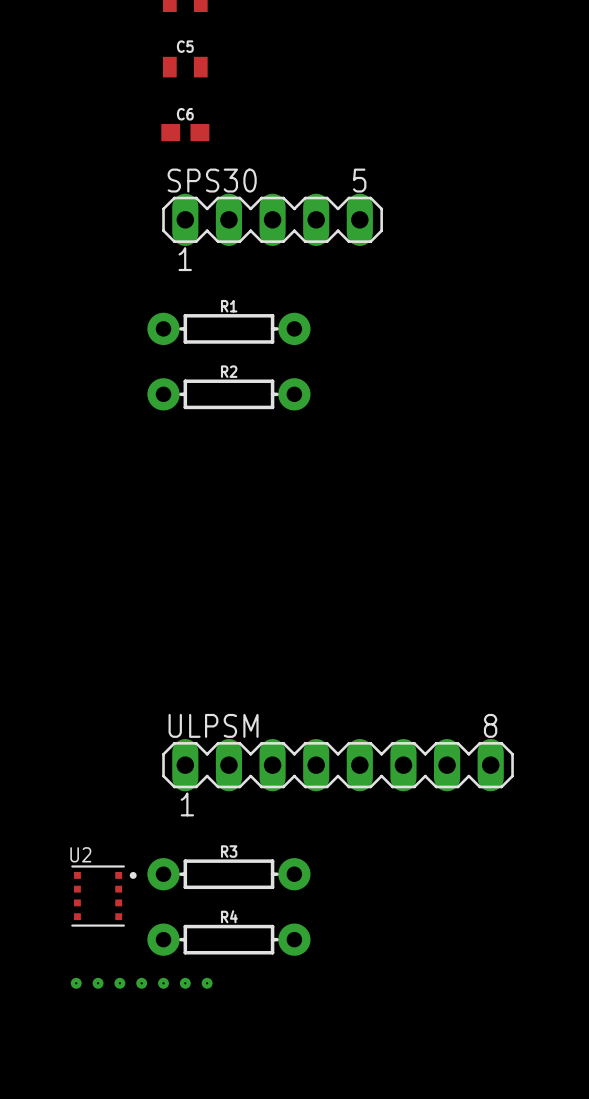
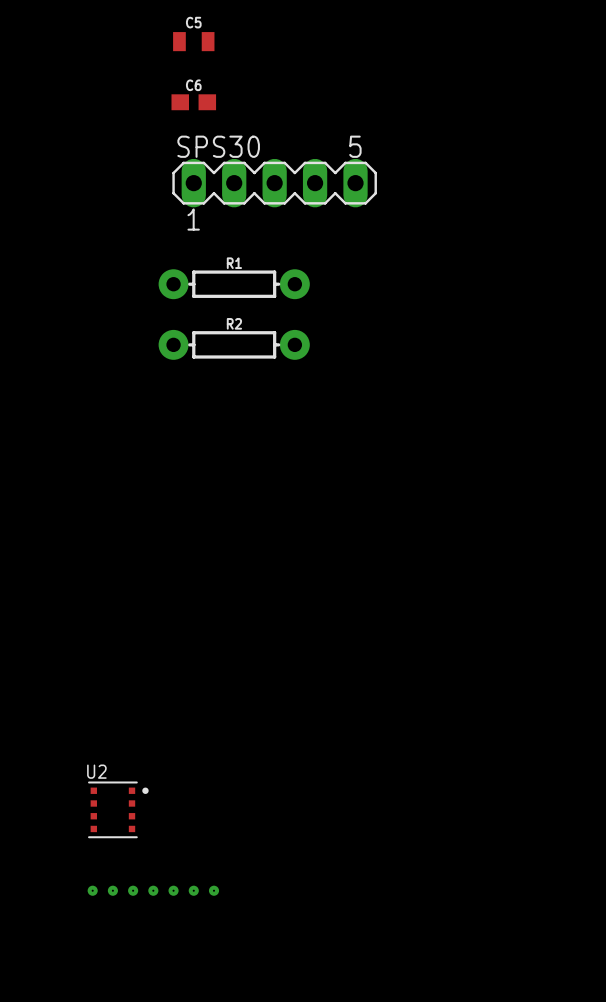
ULPSM: (338, 765) -> none
R3: (228, 874) -> none
R4: (228, 939) -> none

